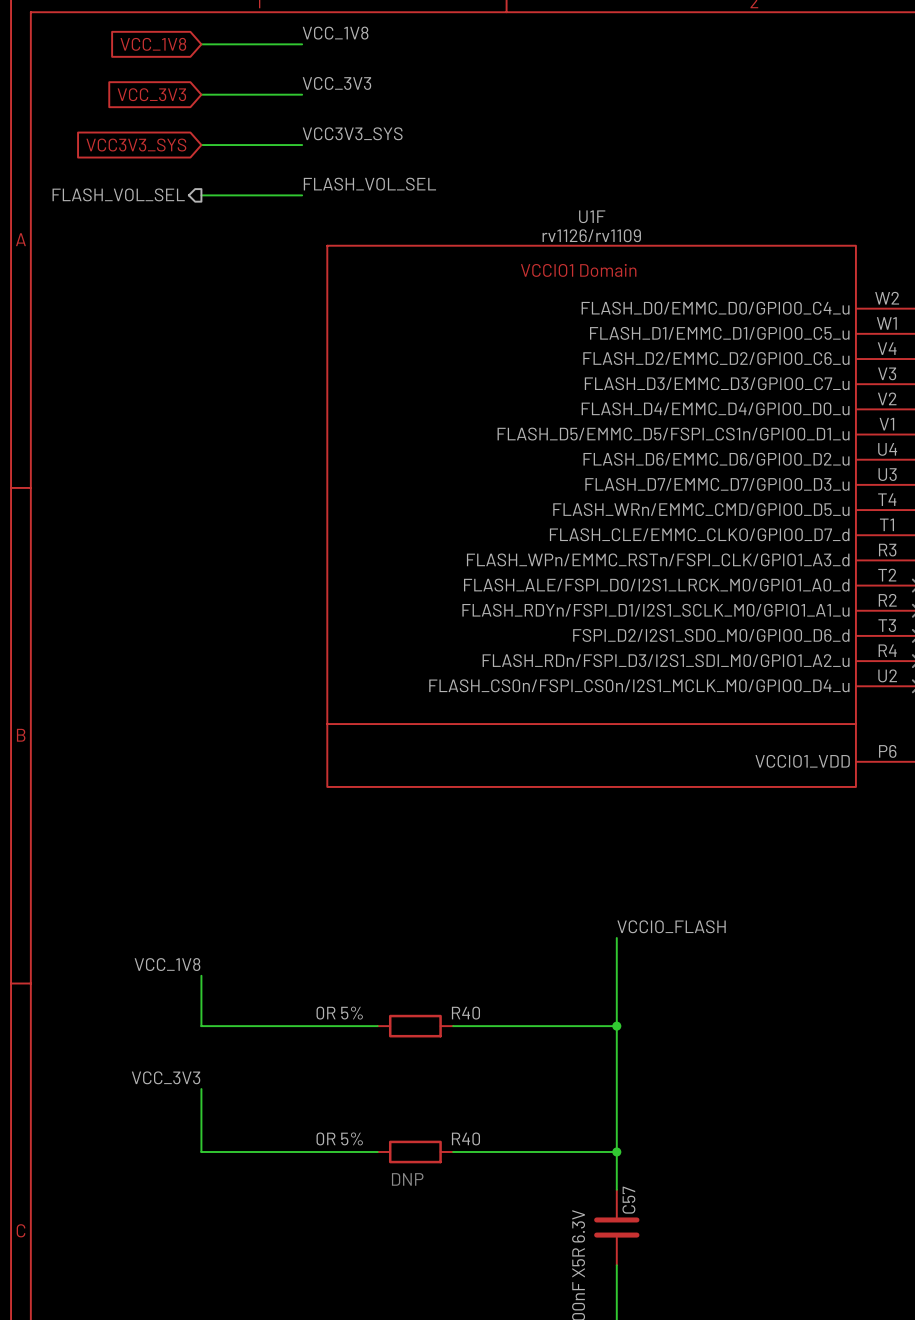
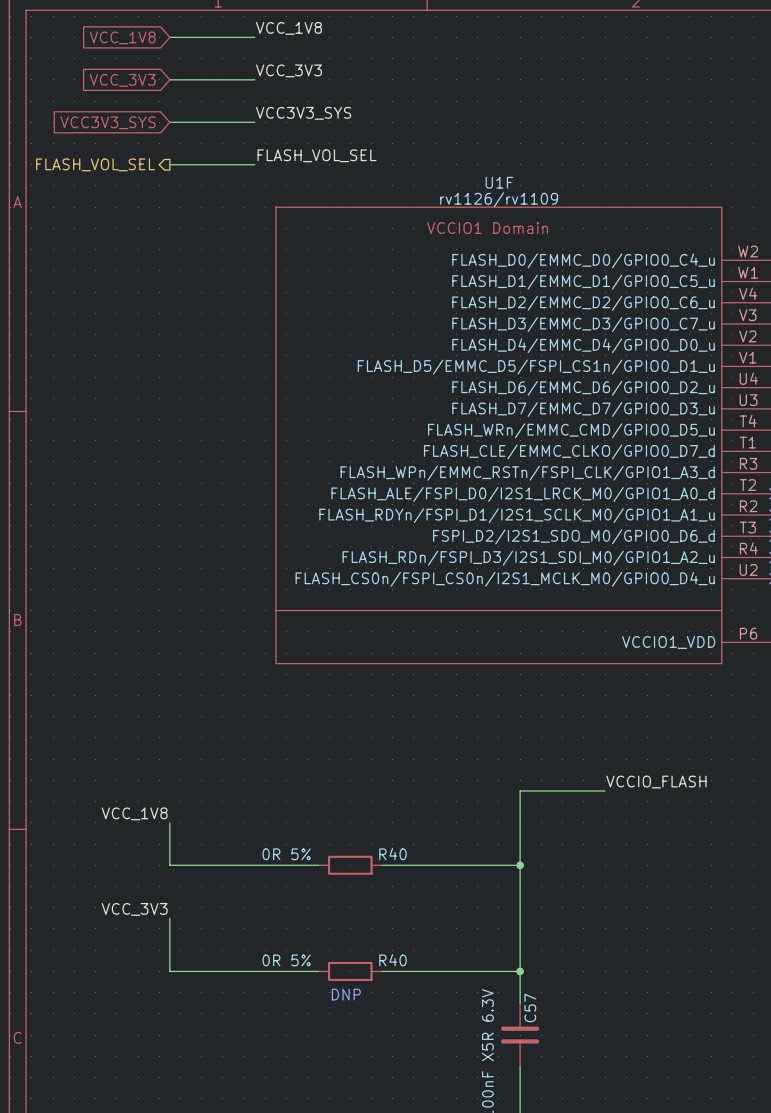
label position: VCCIO_FLASH (671, 926) -> VCCIO_FLASH (656, 782)
wire: none -> (520, 790) (605, 790)

